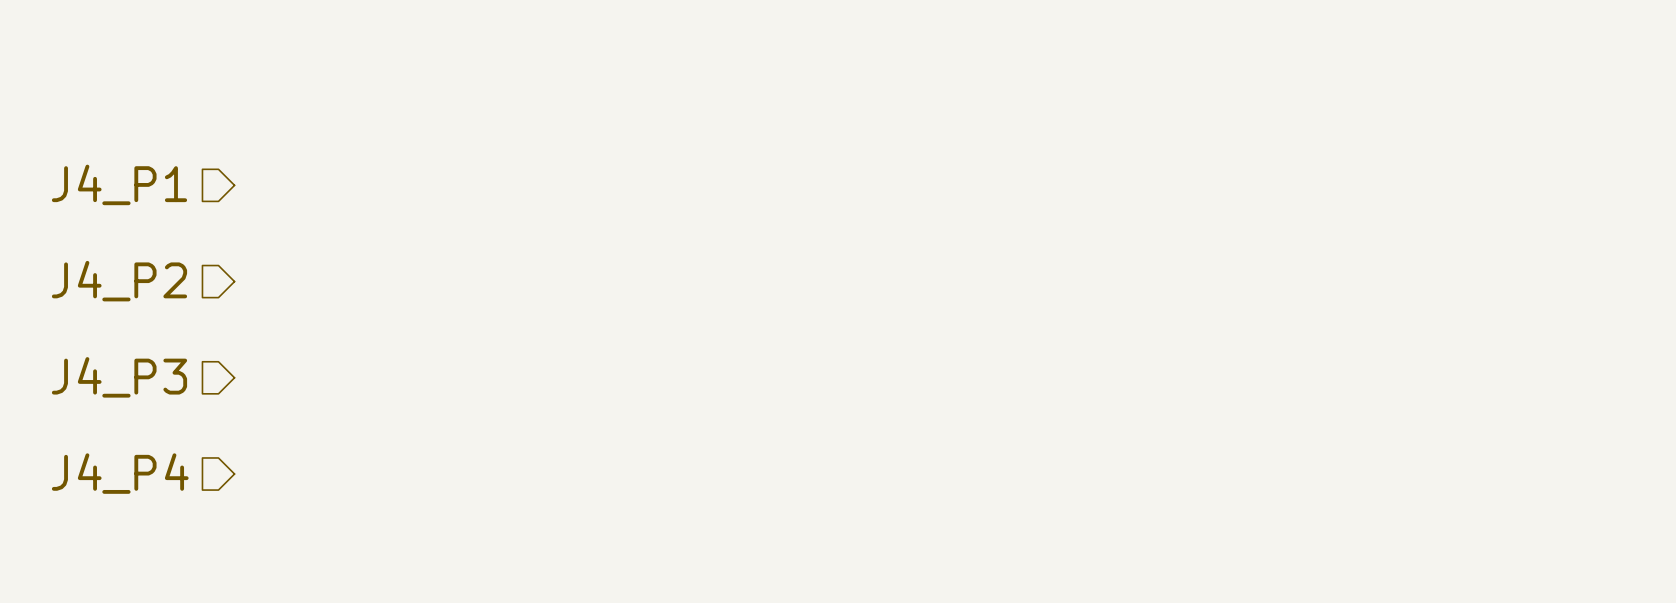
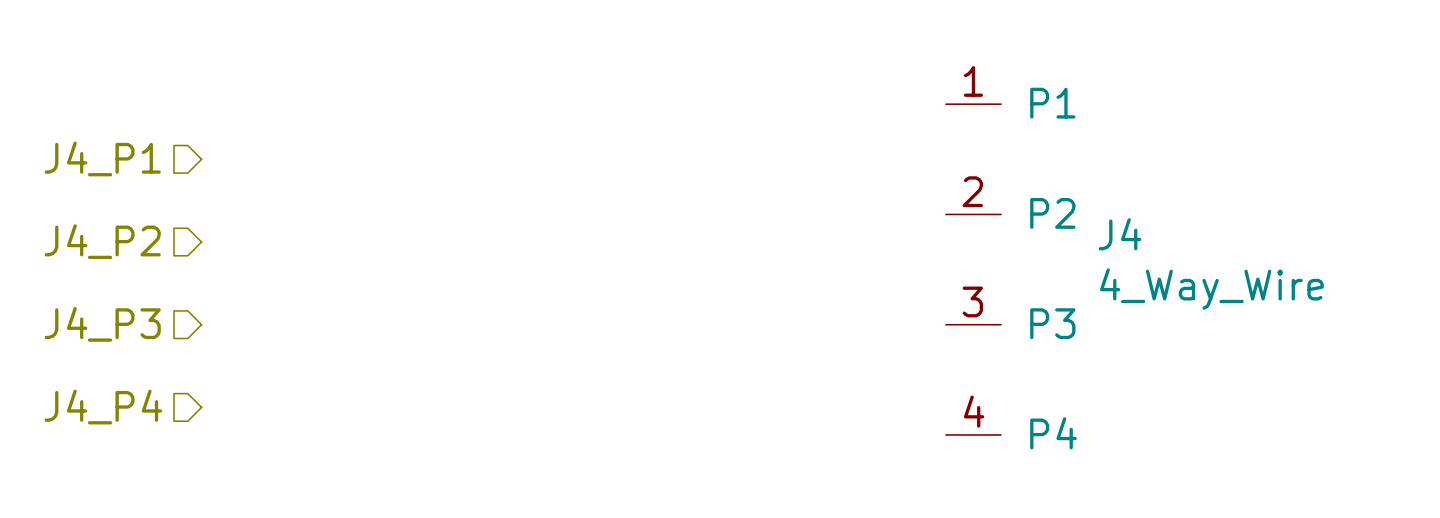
J4: none -> 4_Way_Wire (973, 269)

